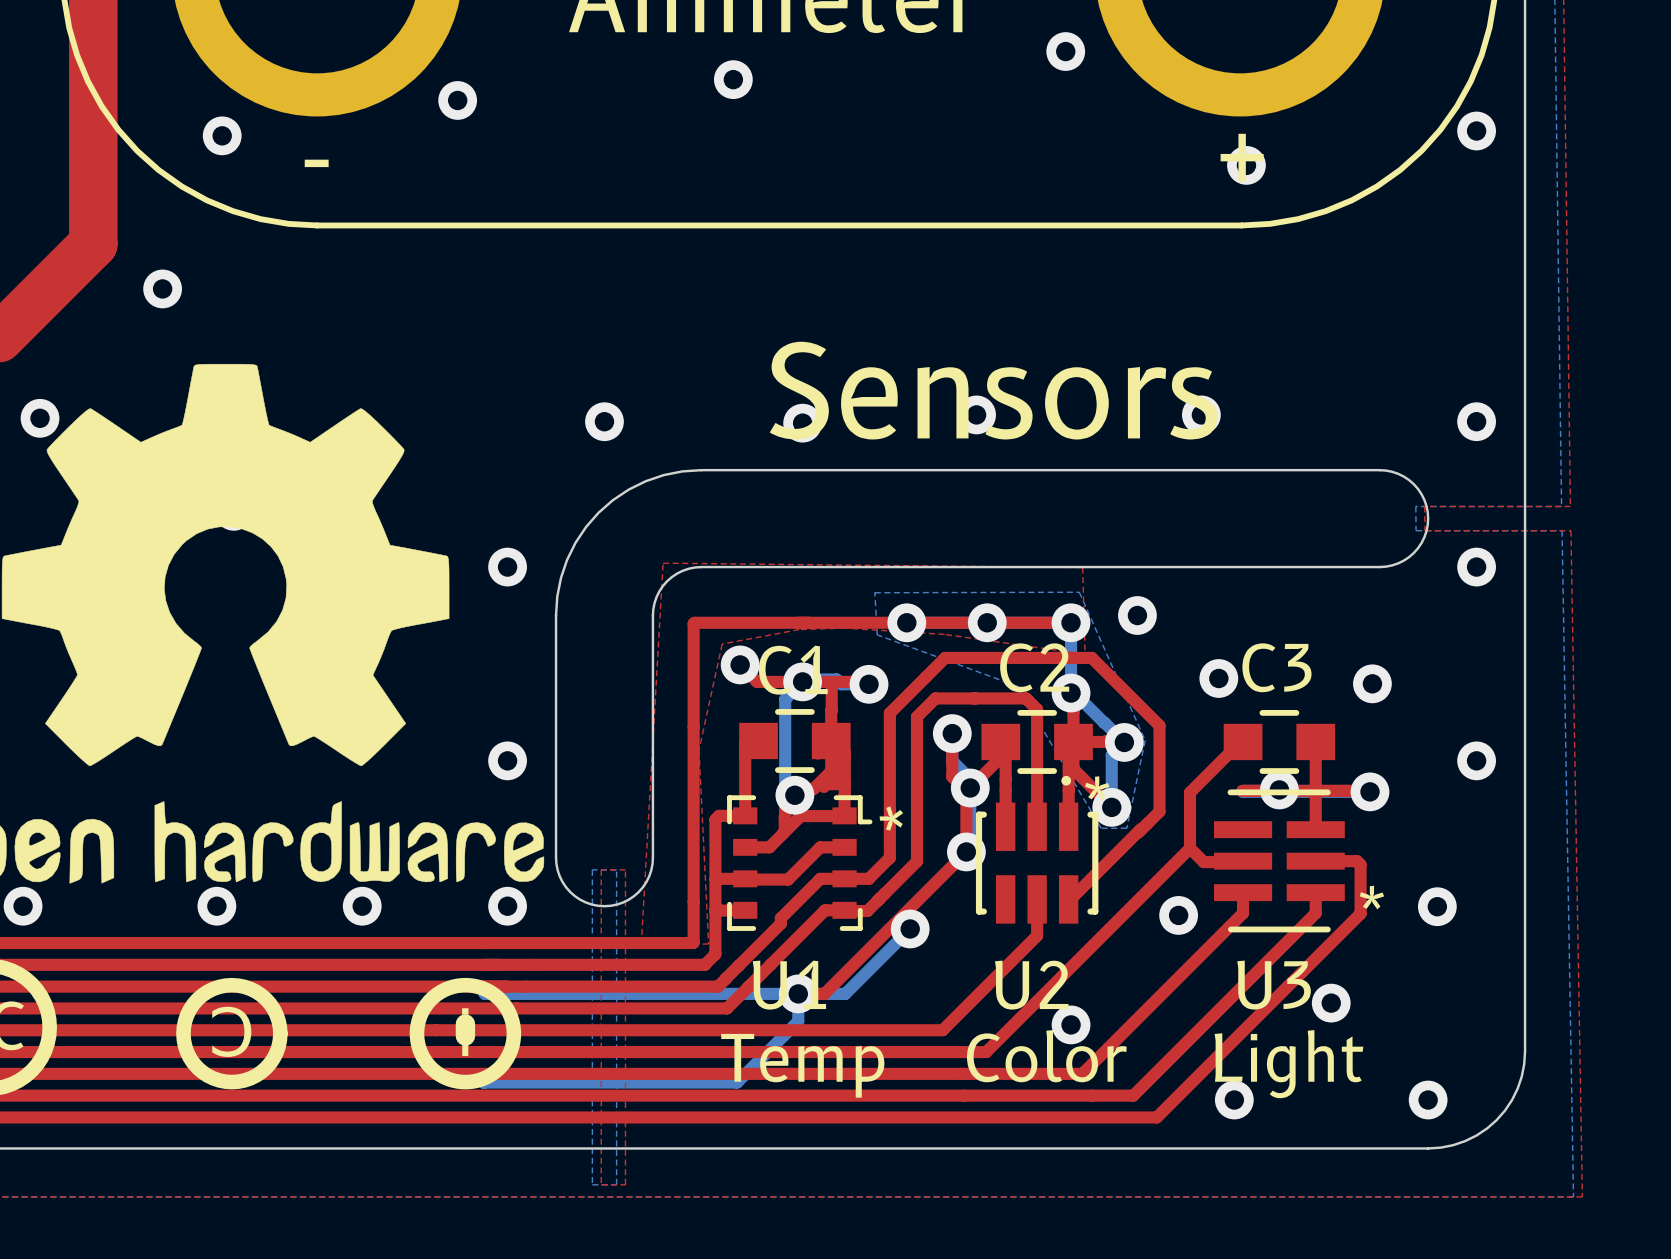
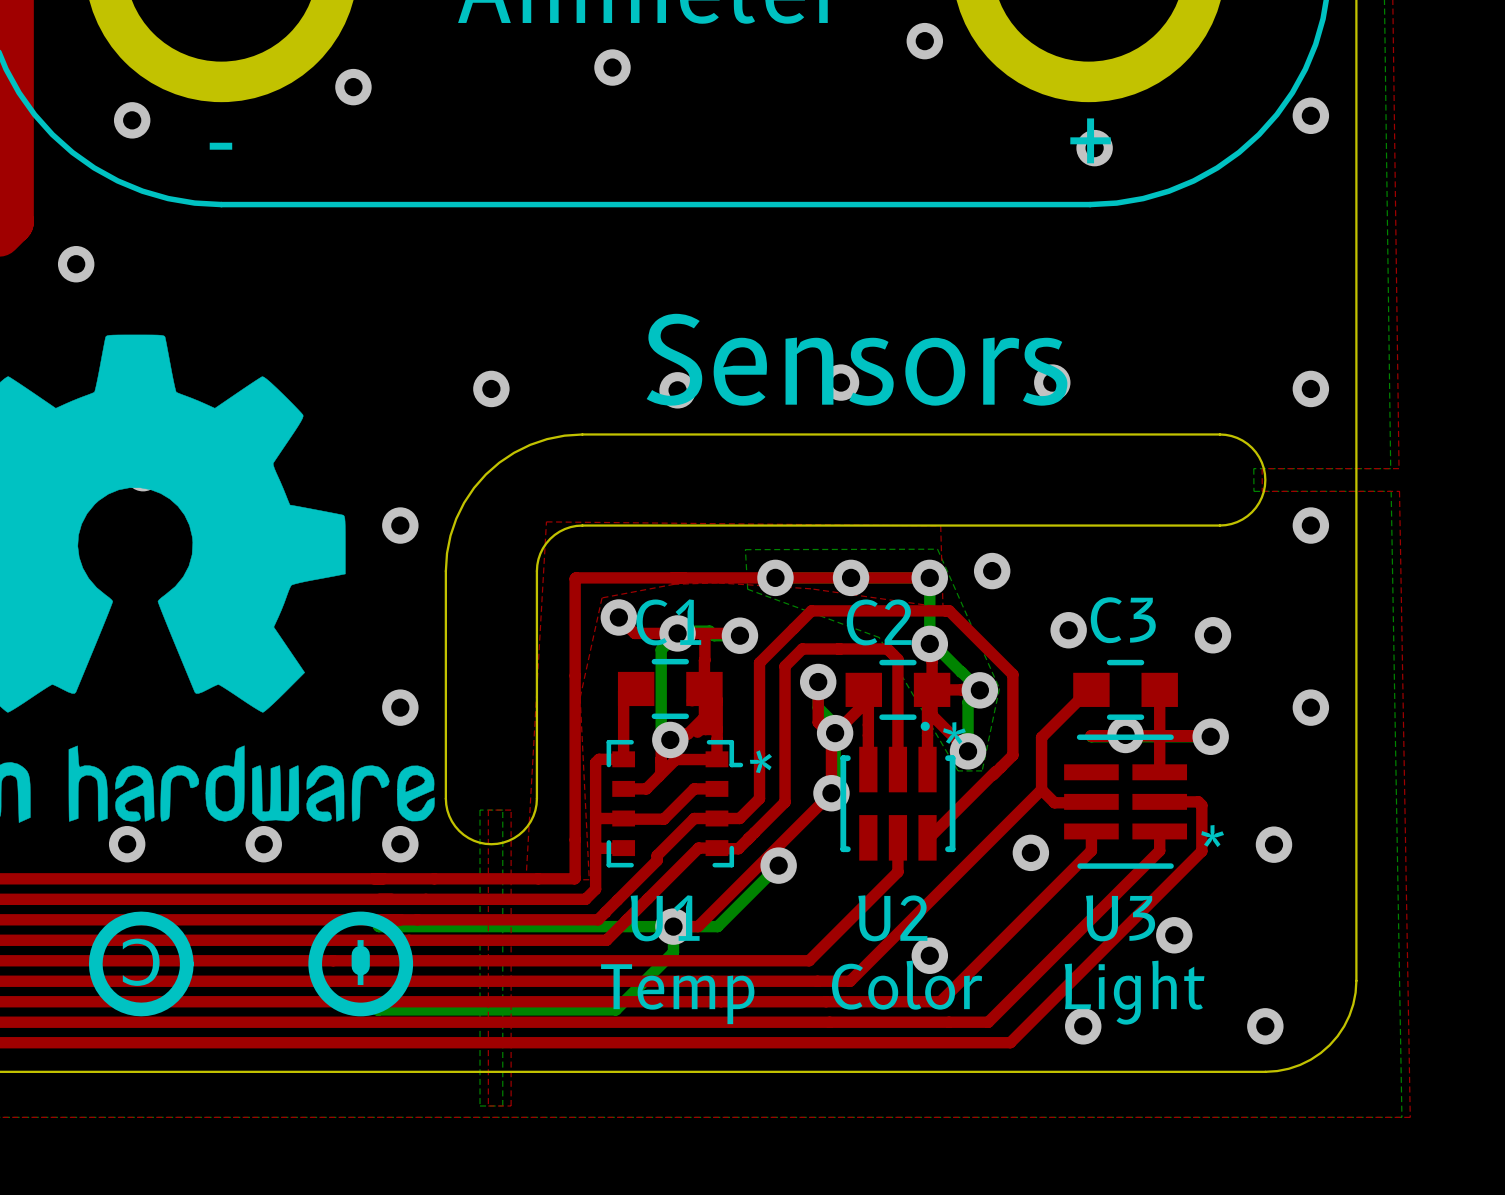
C2 name position: C2 (1034, 667) -> C2 (879, 622)

